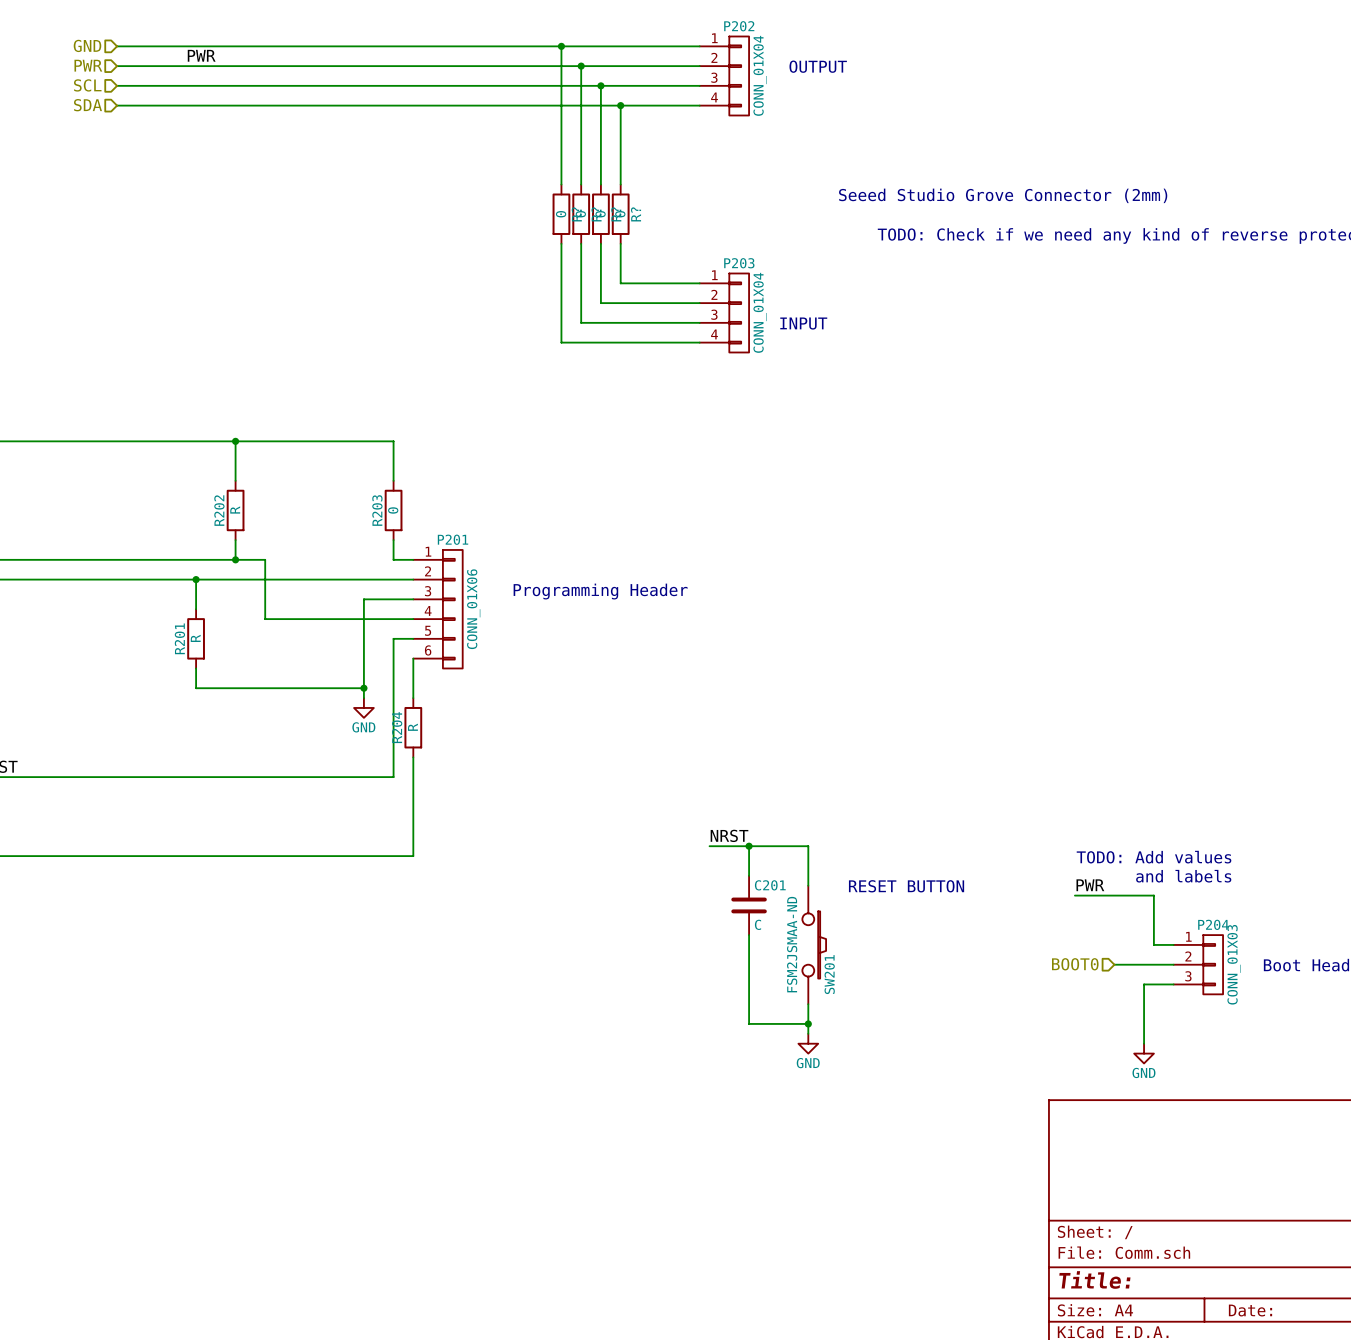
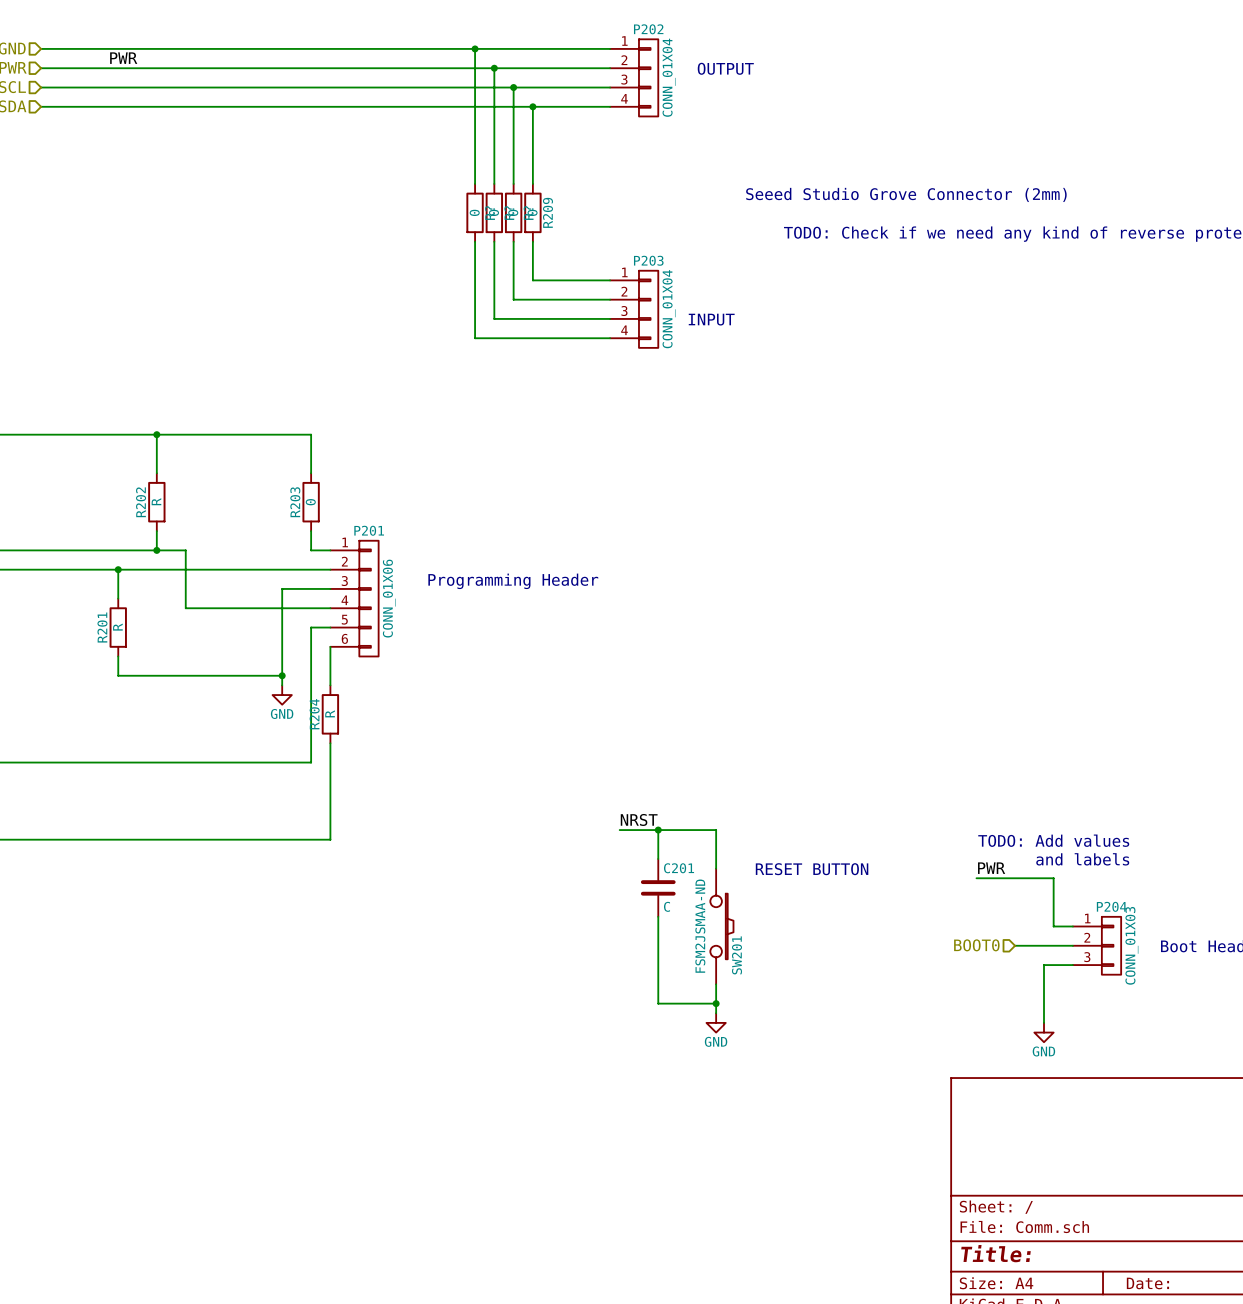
R? name: R? (636, 214) -> R209 (547, 212)

